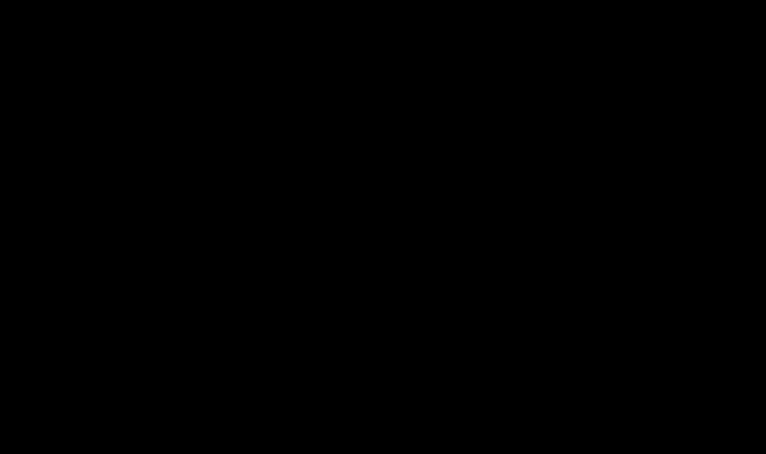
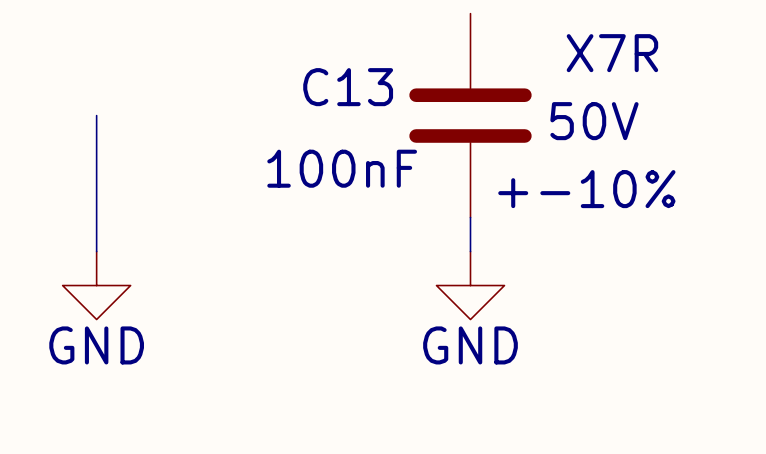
wire: none -> (96, 115) (96, 251)
C13: none -> 100nF (470, 115)
wire: none -> (470, 217) (470, 251)
power symbol: none -> GND (96, 285)
power symbol: none -> GND (470, 285)

